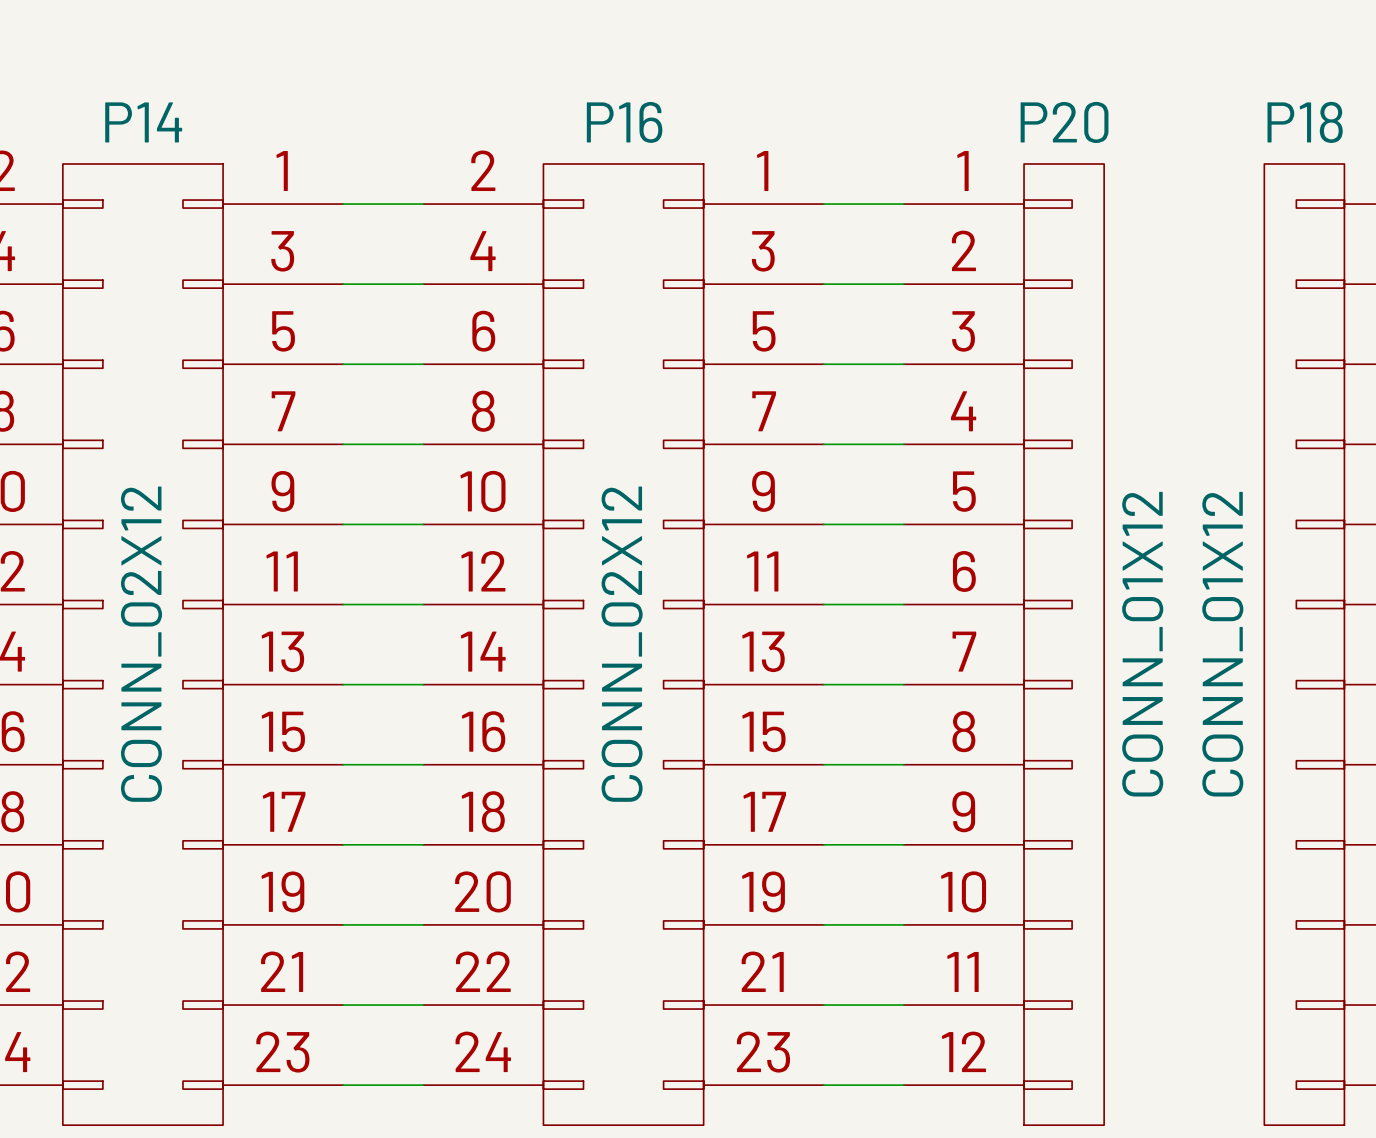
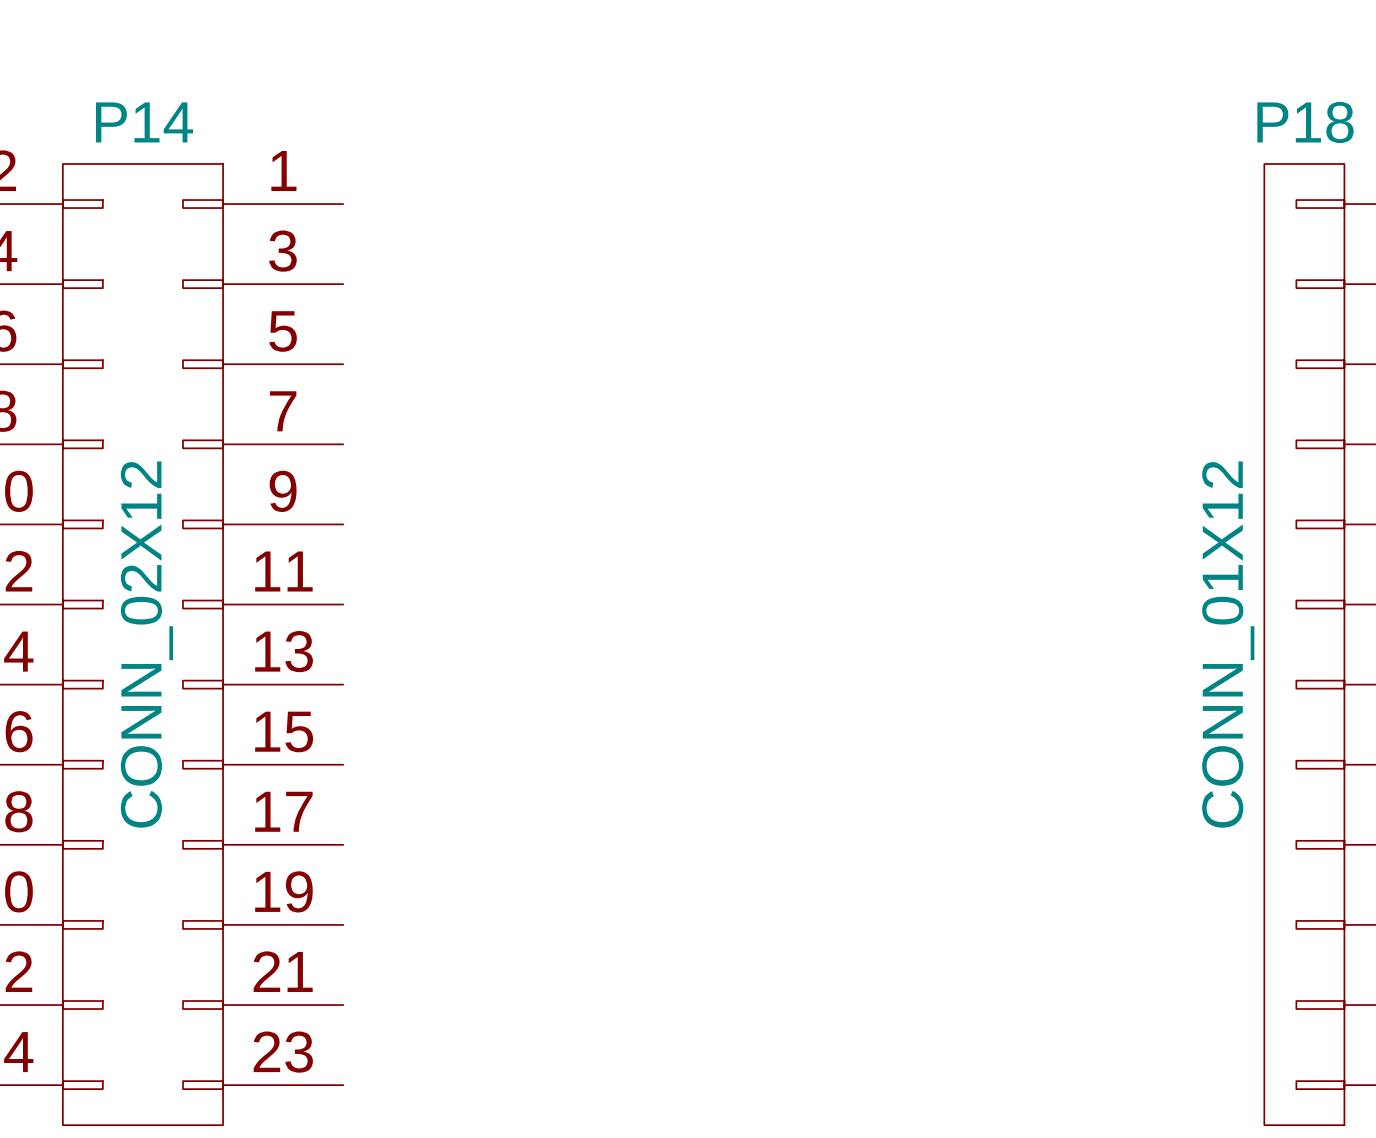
wire: (343, 204) (423, 204) -> none
wire: (823, 204) (903, 204) -> none
wire: (343, 284) (423, 284) -> none
wire: (823, 284) (903, 284) -> none
wire: (343, 364) (423, 364) -> none
wire: (823, 364) (903, 364) -> none
wire: (343, 444) (423, 444) -> none
wire: (823, 444) (903, 444) -> none
wire: (343, 524) (423, 524) -> none
wire: (823, 524) (903, 524) -> none
wire: (343, 604) (423, 604) -> none
wire: (823, 604) (903, 604) -> none
P16: CONN_02X12 (623, 644) -> none
P20: CONN_01X12 (1004, 644) -> none
wire: (343, 684) (423, 684) -> none
wire: (823, 684) (903, 684) -> none
wire: (343, 764) (423, 764) -> none
wire: (823, 764) (903, 764) -> none
wire: (343, 844) (423, 844) -> none
wire: (823, 844) (903, 844) -> none
wire: (343, 924) (423, 924) -> none
wire: (823, 924) (903, 924) -> none
wire: (343, 1005) (423, 1005) -> none
wire: (823, 1005) (903, 1005) -> none
wire: (343, 1085) (423, 1085) -> none
wire: (823, 1085) (903, 1085) -> none

